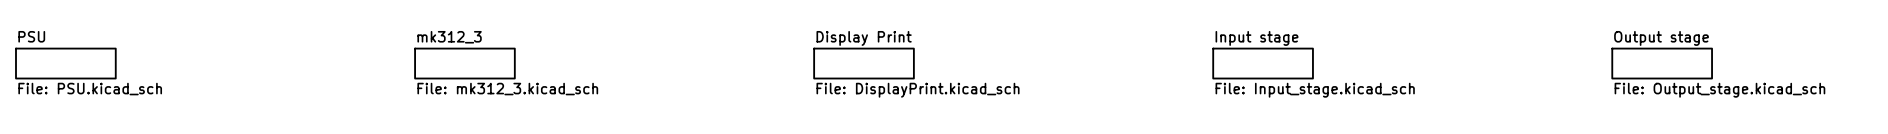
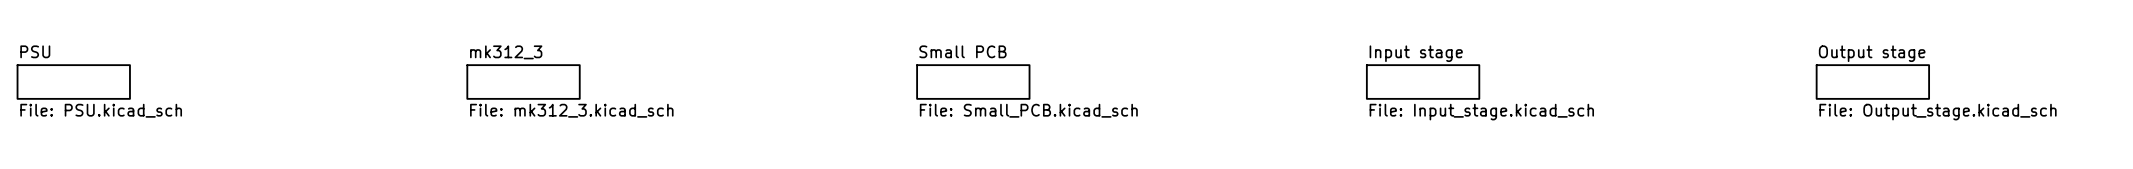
sheet Display Print name: Display Print (864, 38) -> Small PCB (962, 51)
sheet Display Print value: File: DisplayPrint.kicad_sch (918, 90) -> File: Small_PCB.kicad_sch (1028, 110)

